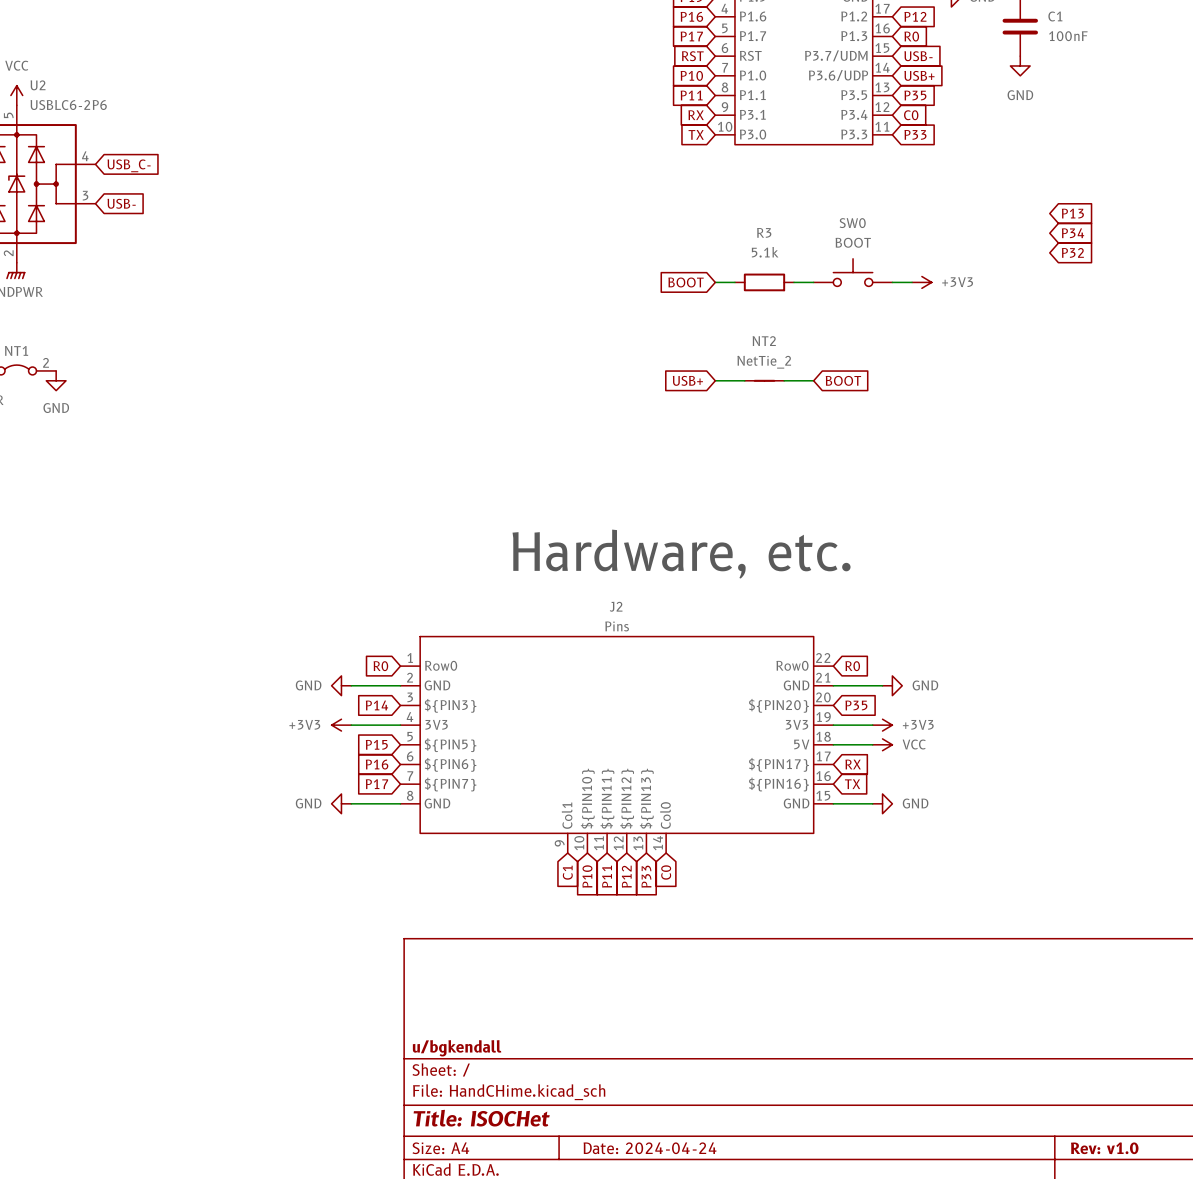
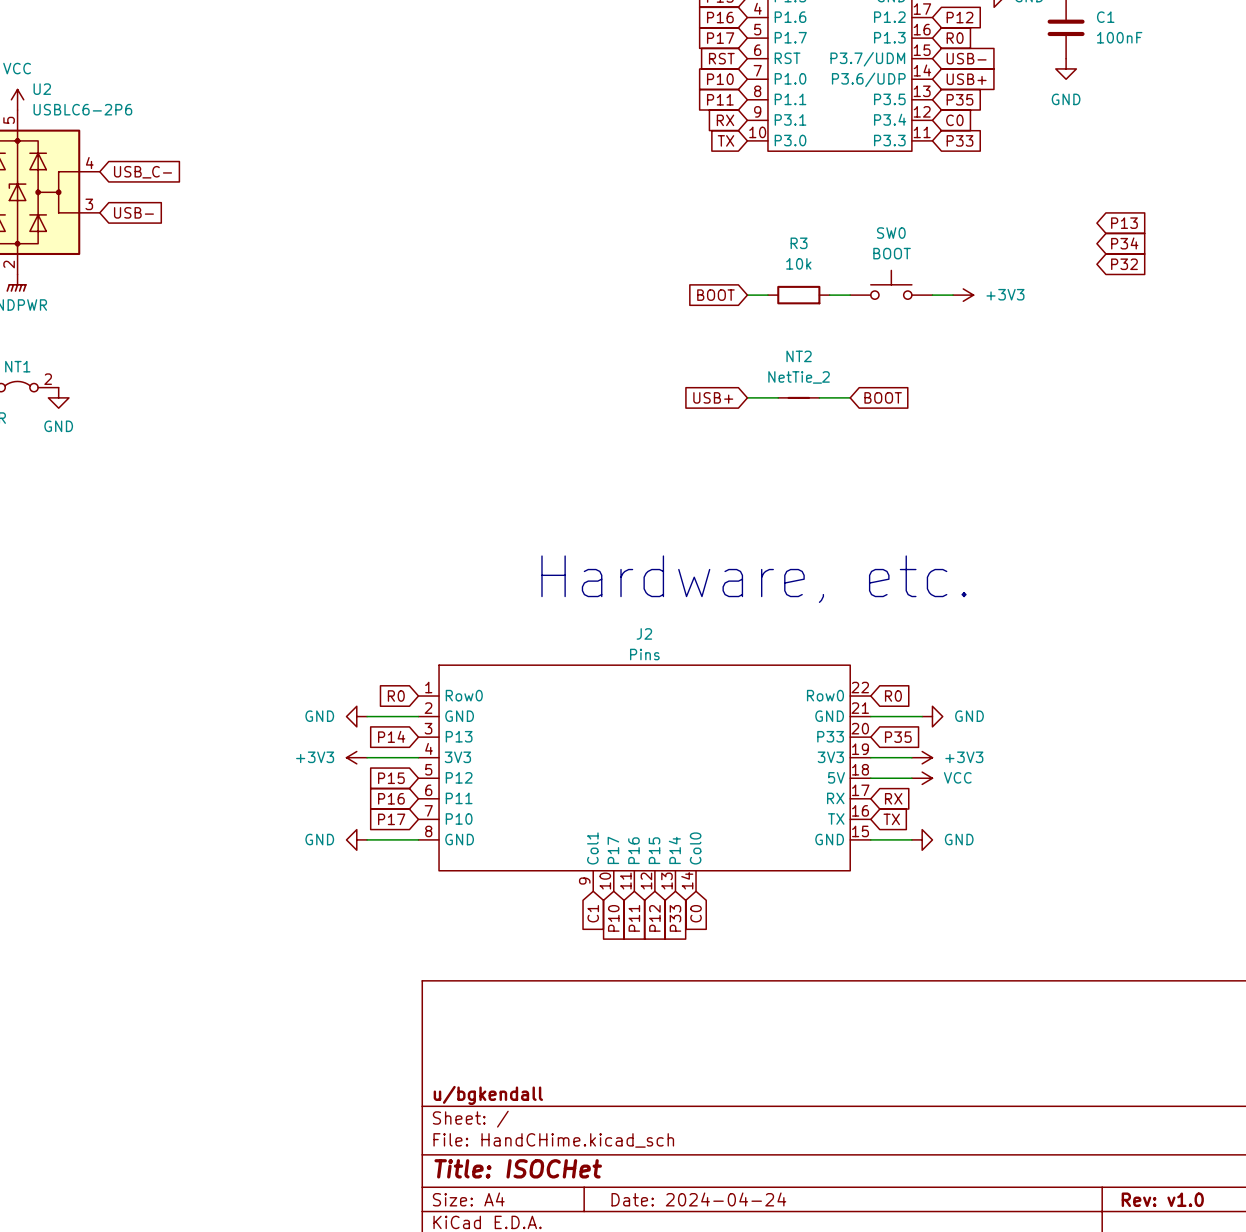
R3 value: 5.1k (765, 252) -> 10k (798, 263)
J2 symbol: [400, 636, 834, 854] -> [418, 665, 871, 892]

